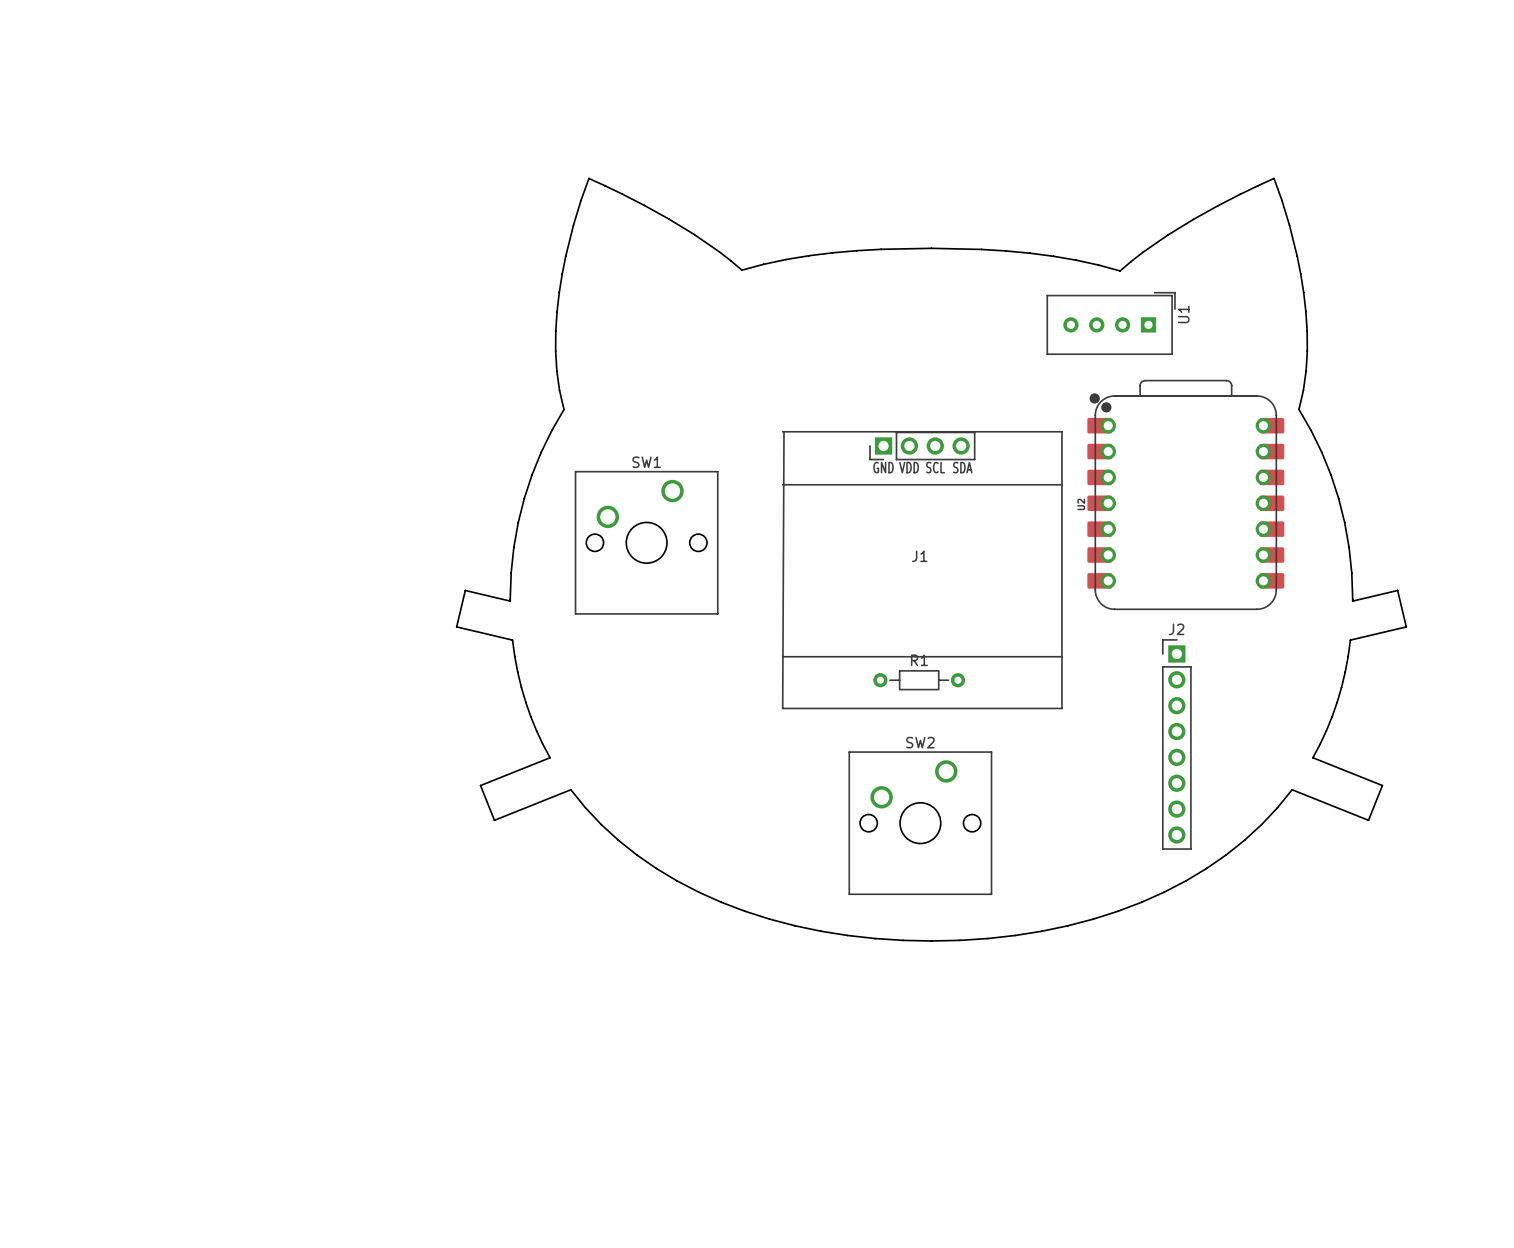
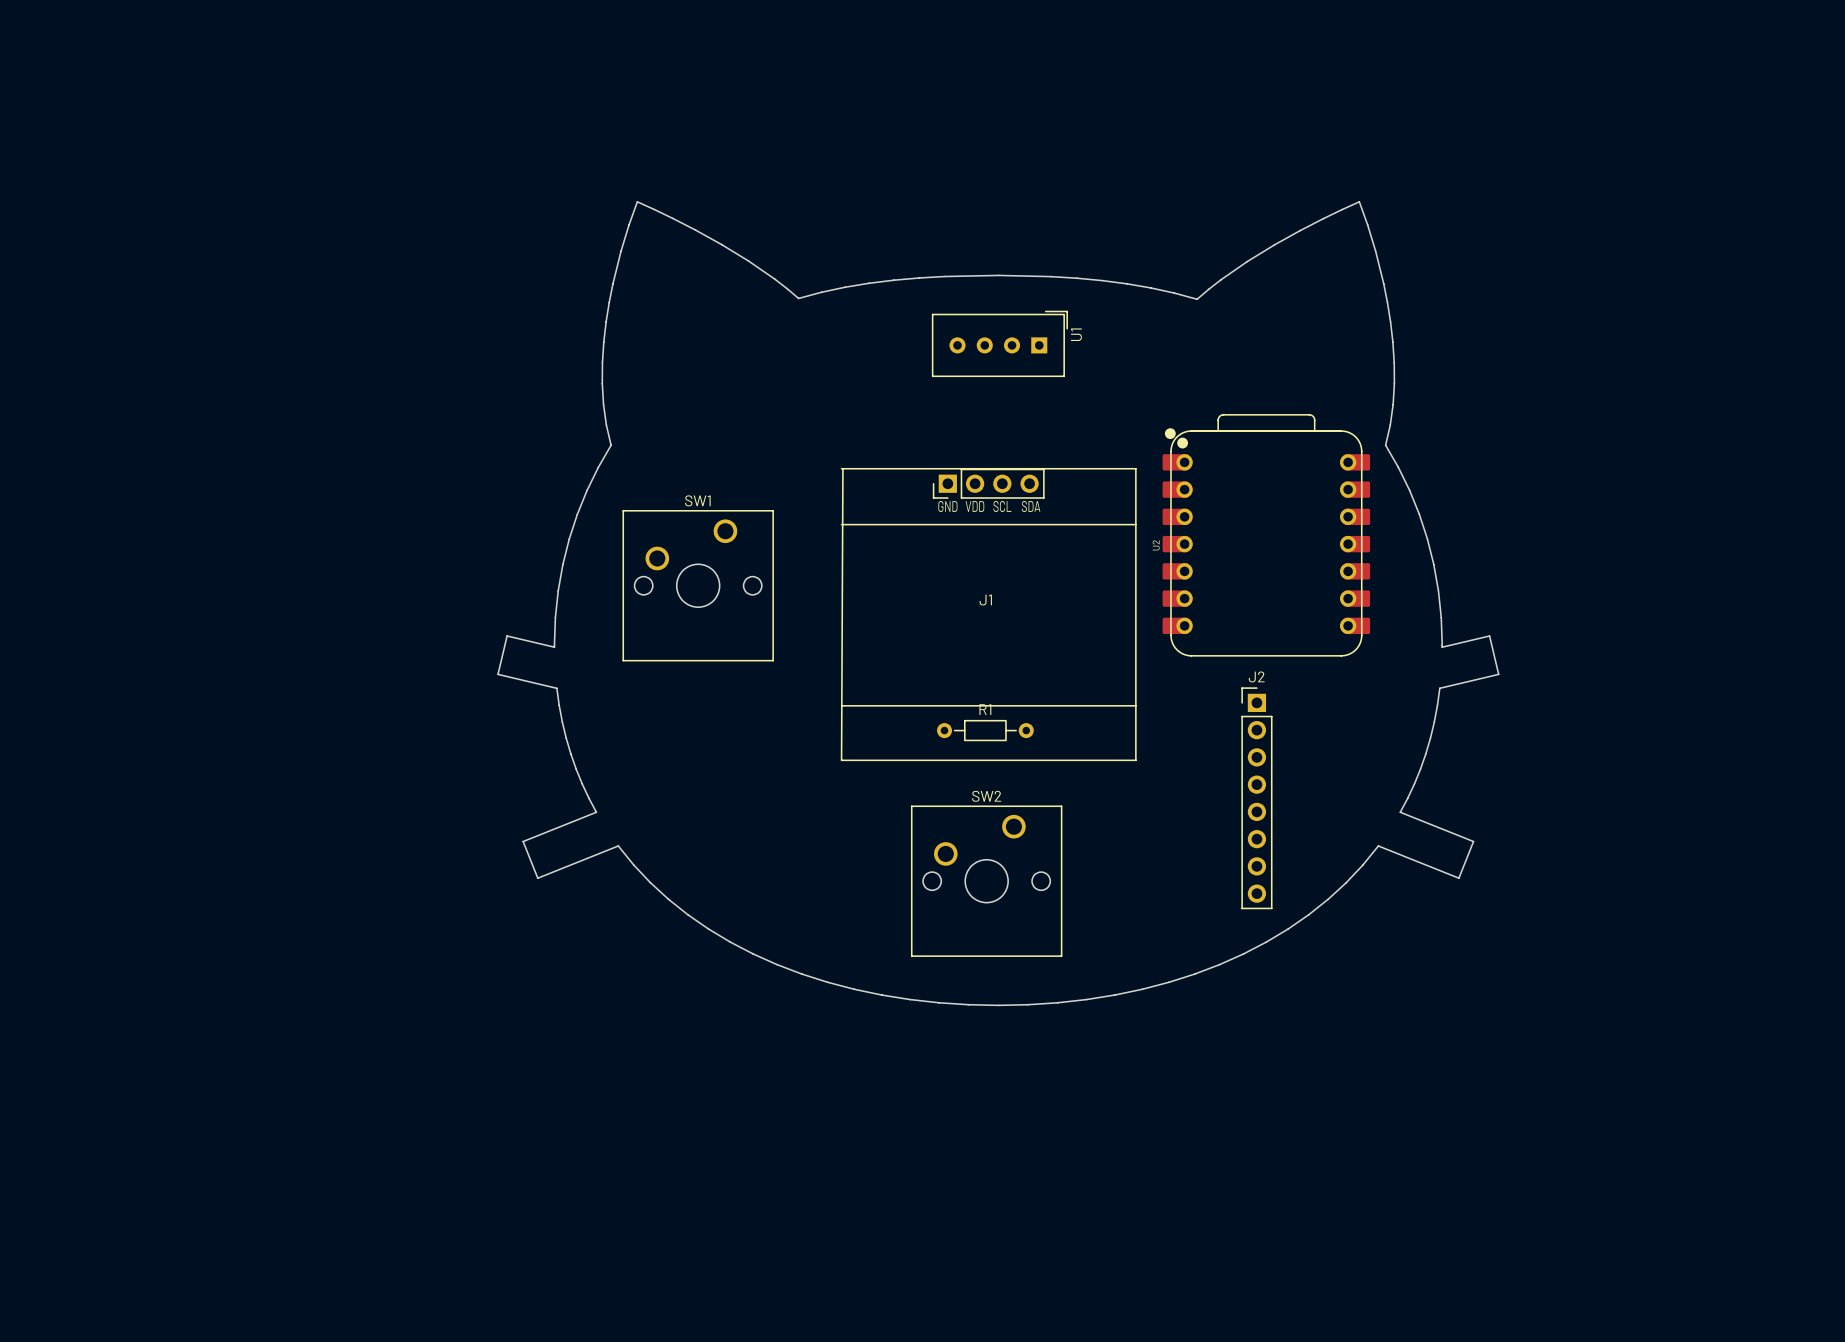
U1 position: (1111, 323) -> (999, 343)

